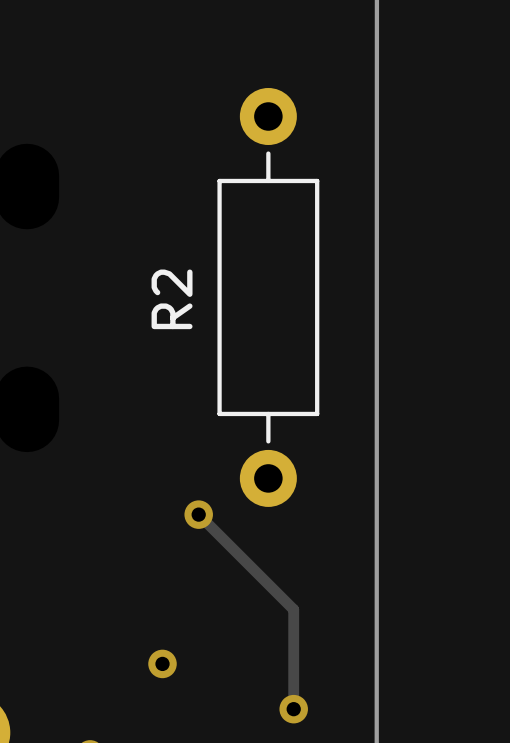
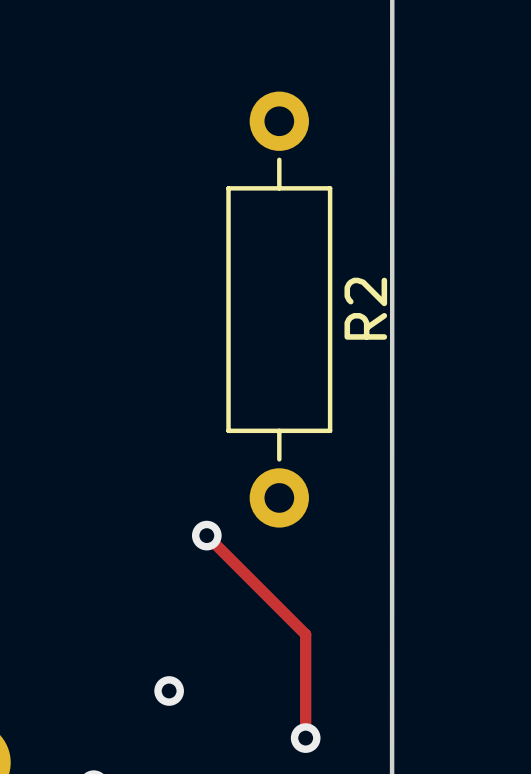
R2 name position: R2 (172, 299) -> R2 (365, 308)

